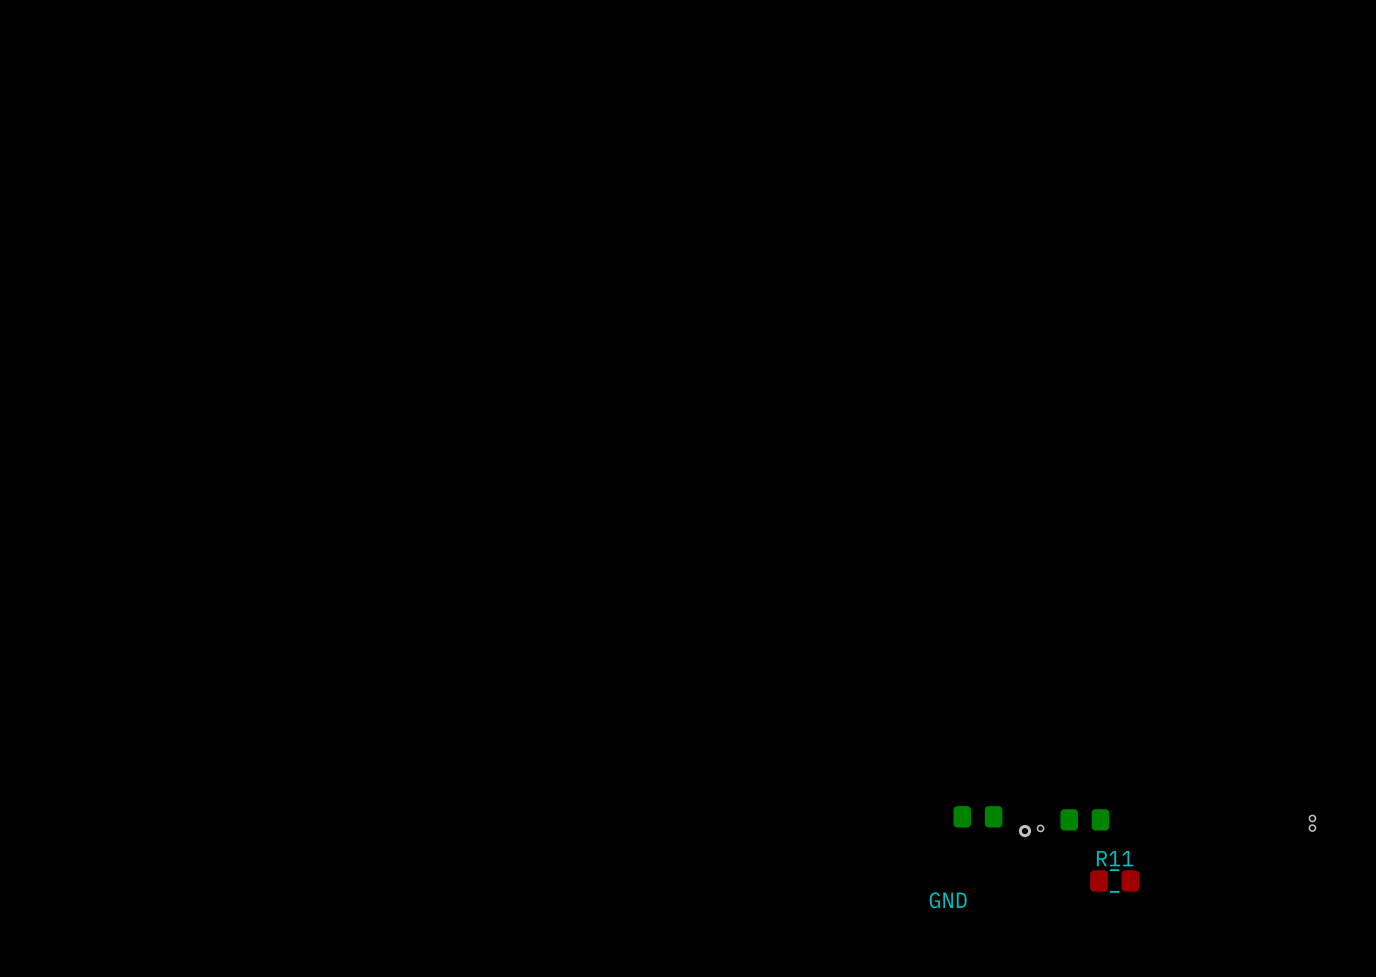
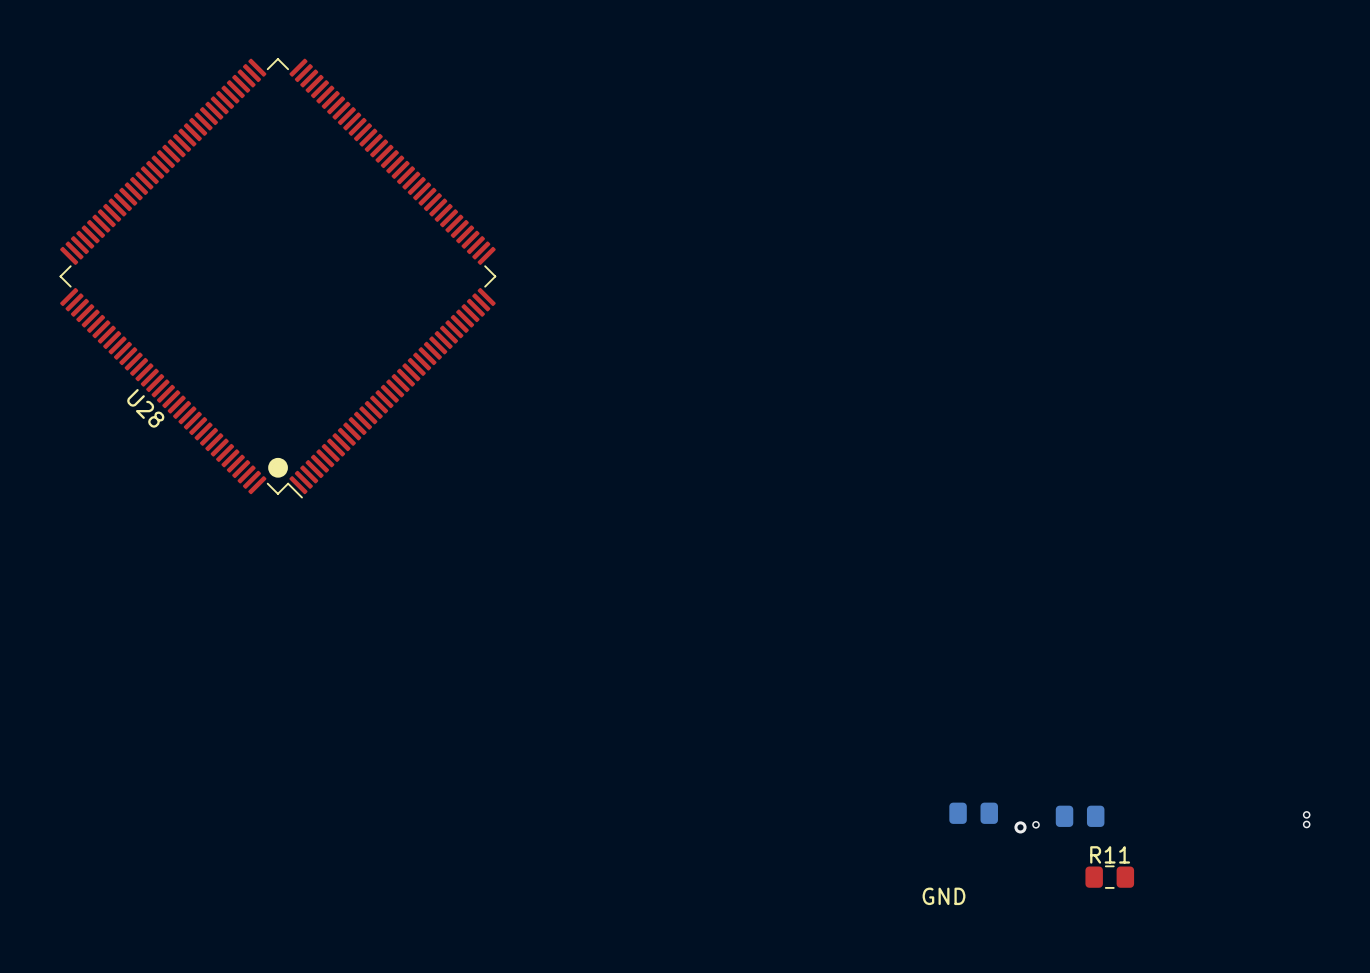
U28: none -> (277, 278)

